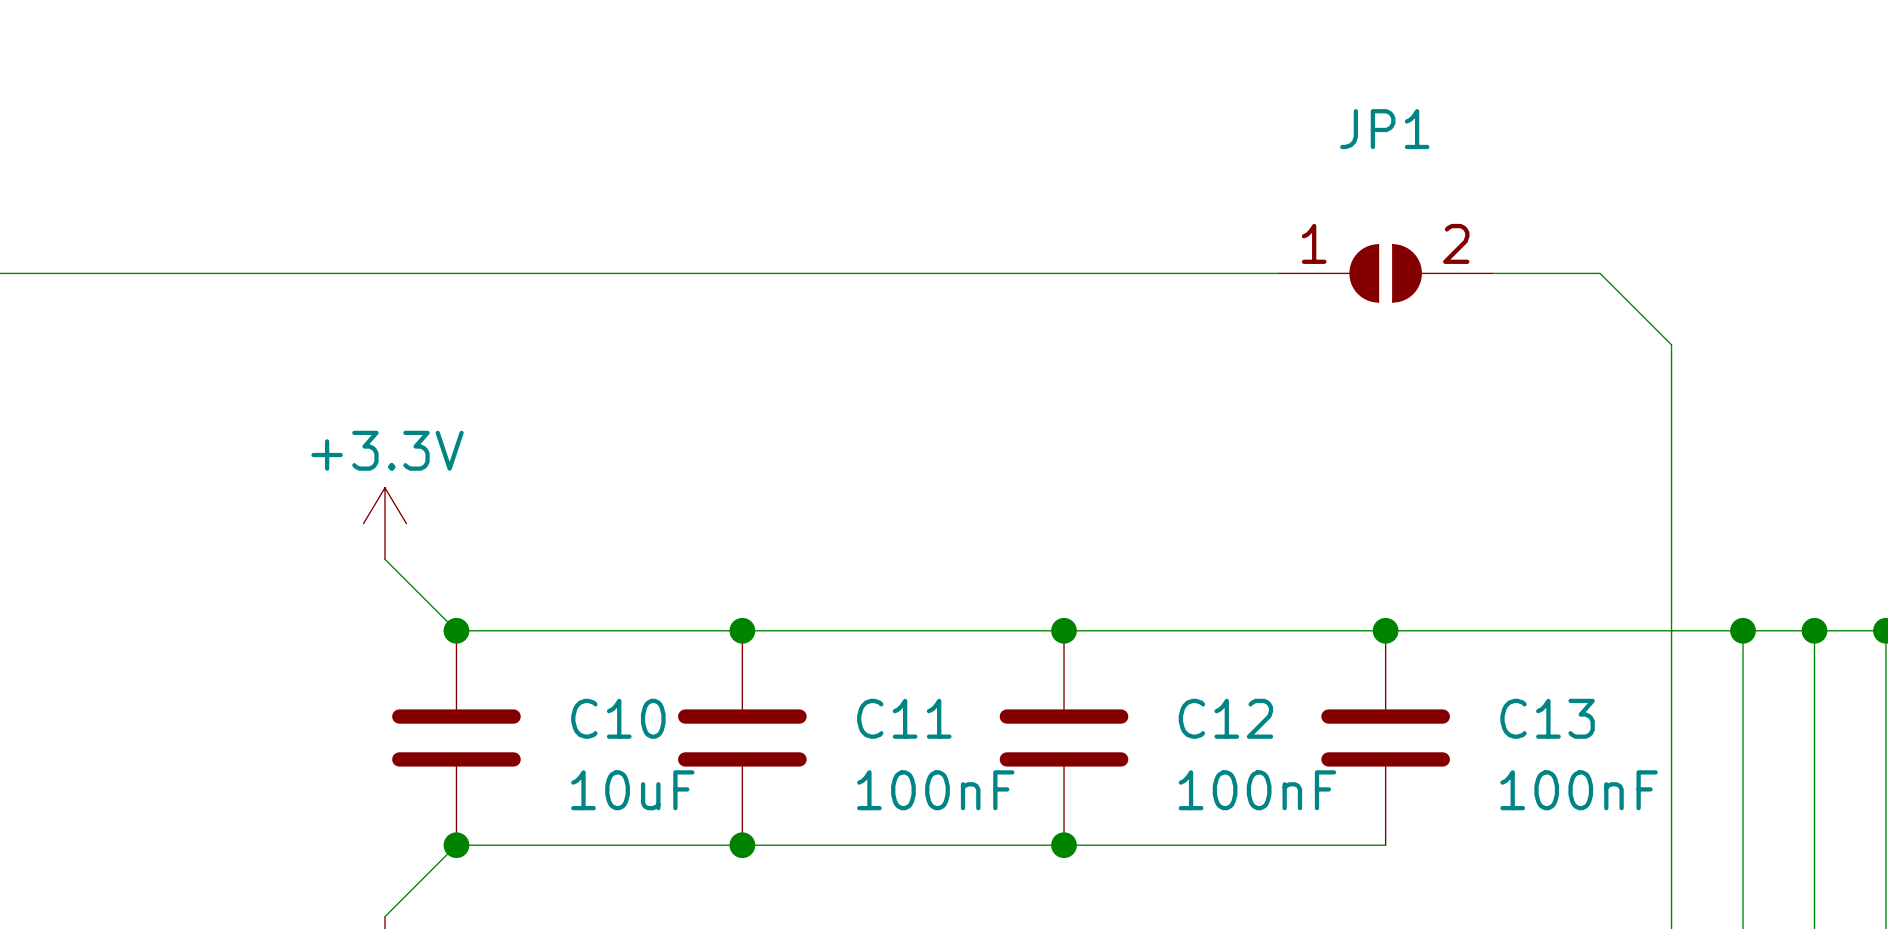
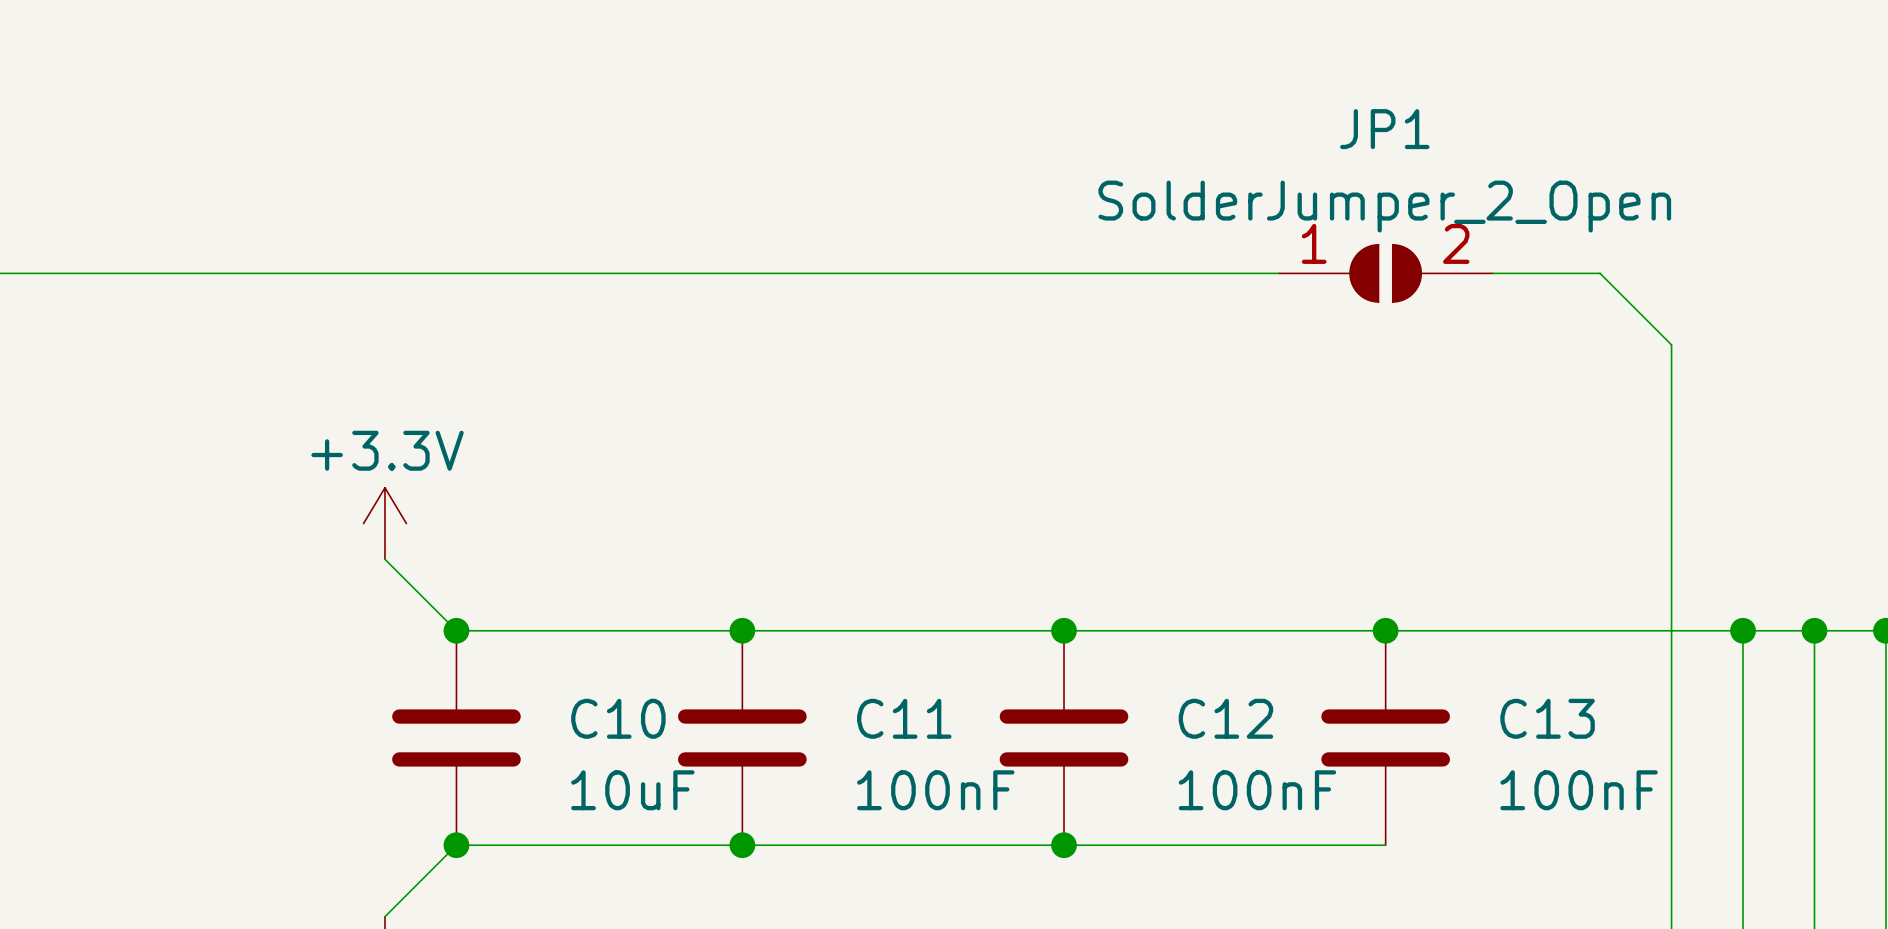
JP1 value: none -> SolderJumper_2_Open (1384, 206)

